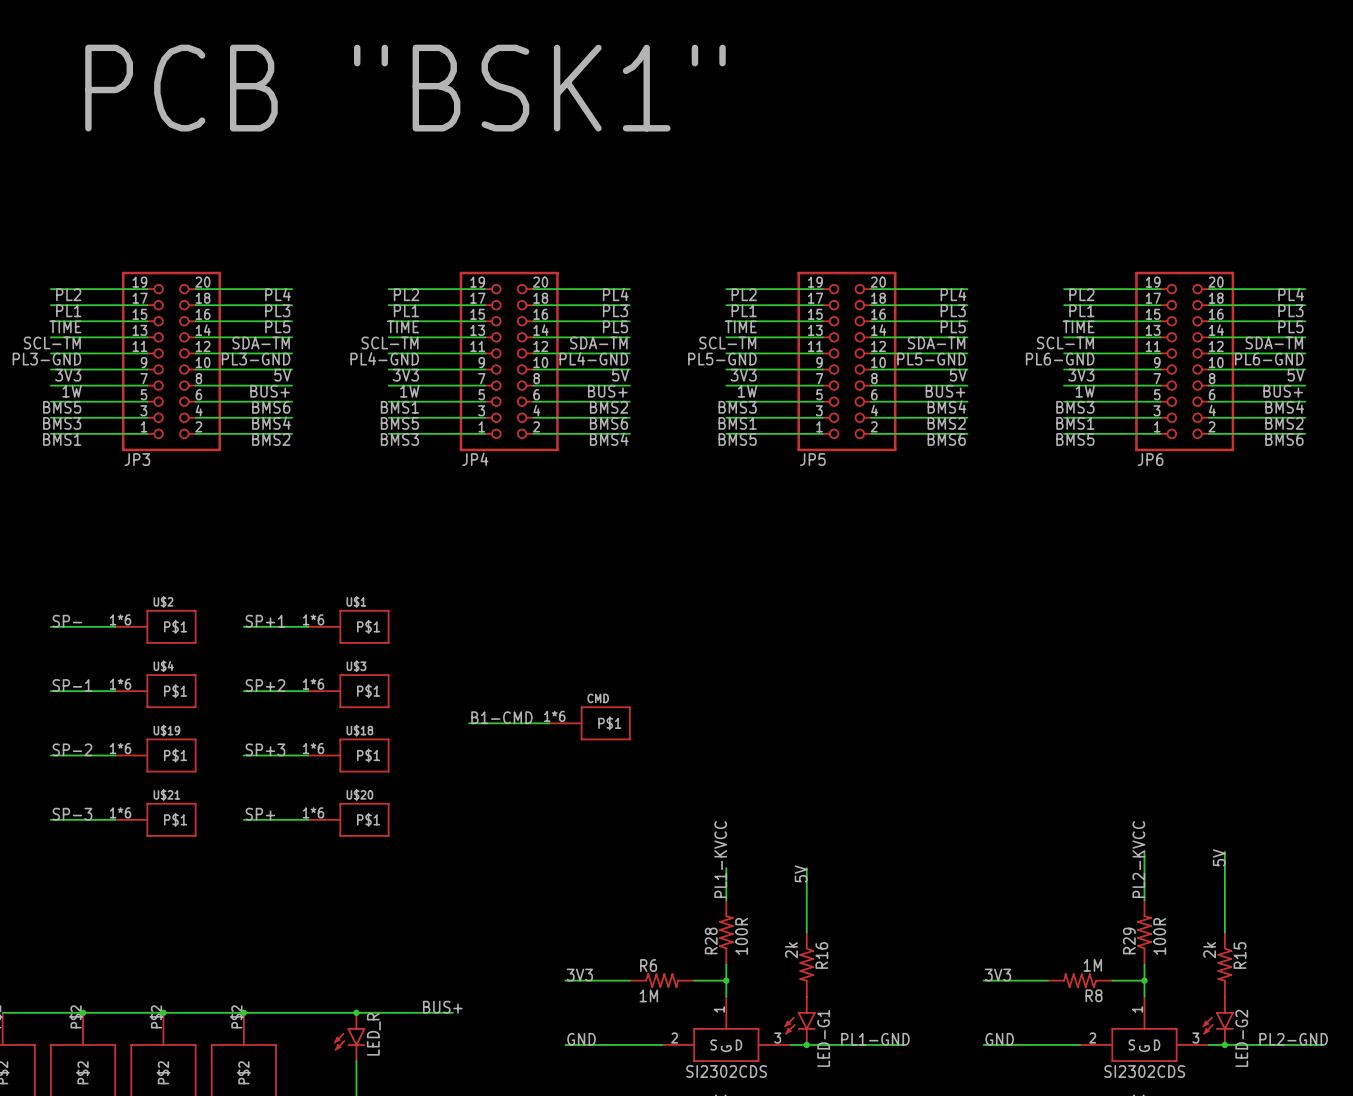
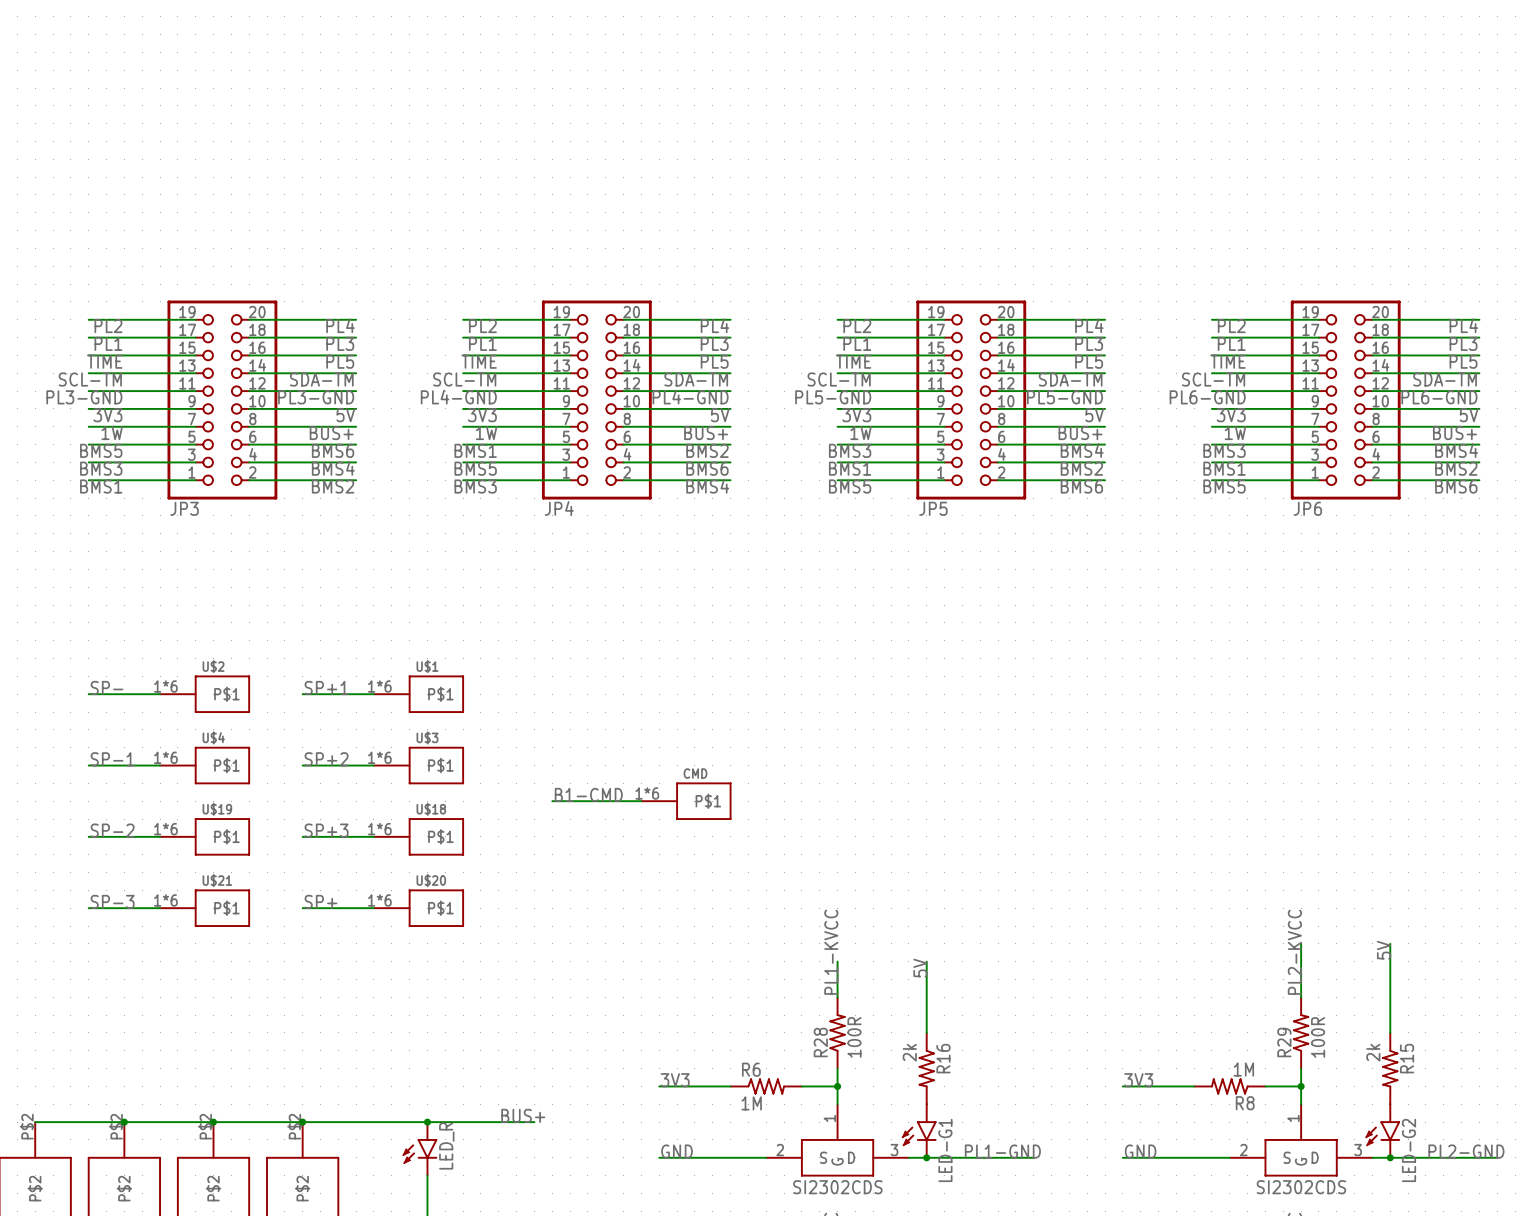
part: PCB "BSK1" (405, 88) -> none

